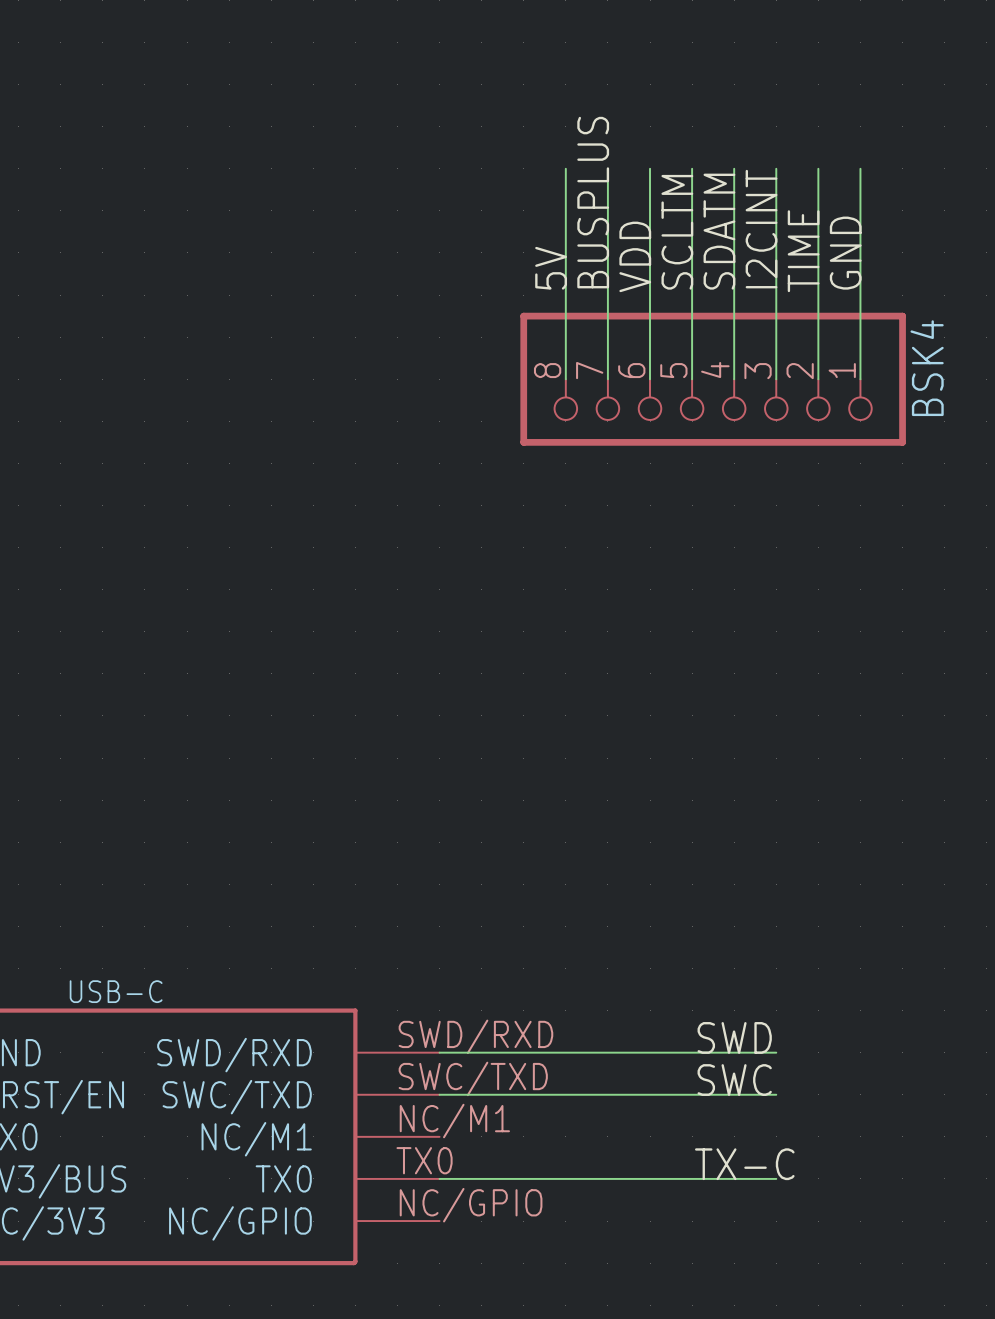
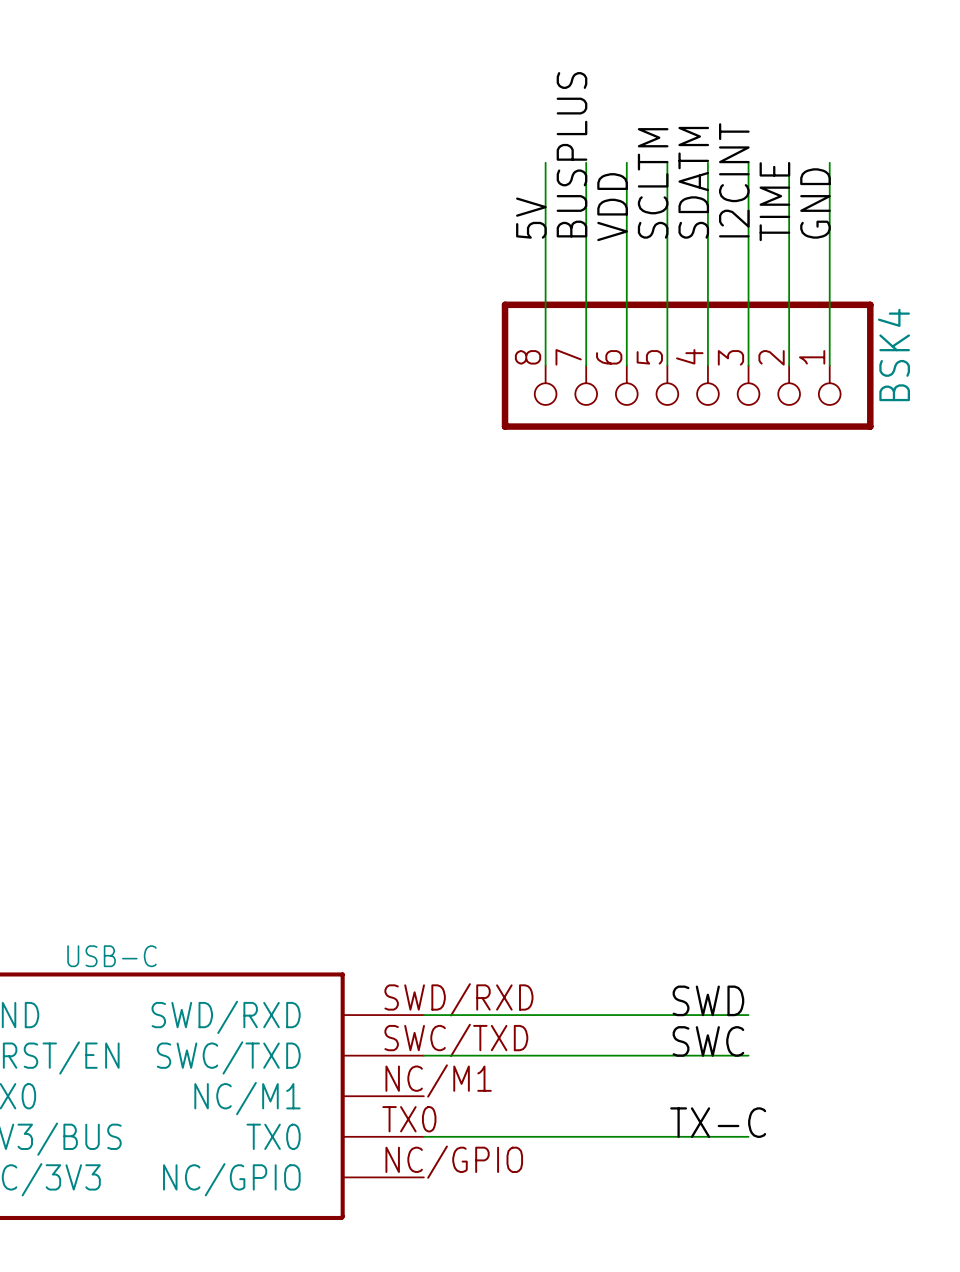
label position: BUSPLUS (593, 202) -> BUSPLUS (571, 154)
label position: I2CINT (761, 229) -> I2CINT (734, 180)
label position: SDATM (719, 231) -> SDATM (693, 182)
label position: SCLTM (677, 232) -> SCLTM (653, 183)
label position: TIME (803, 251) -> TIME (774, 201)
label position: GND (845, 253) -> GND (815, 203)
label position: VDD (635, 256) -> VDD (612, 207)
label position: 5V (551, 268) -> 5V (531, 218)

